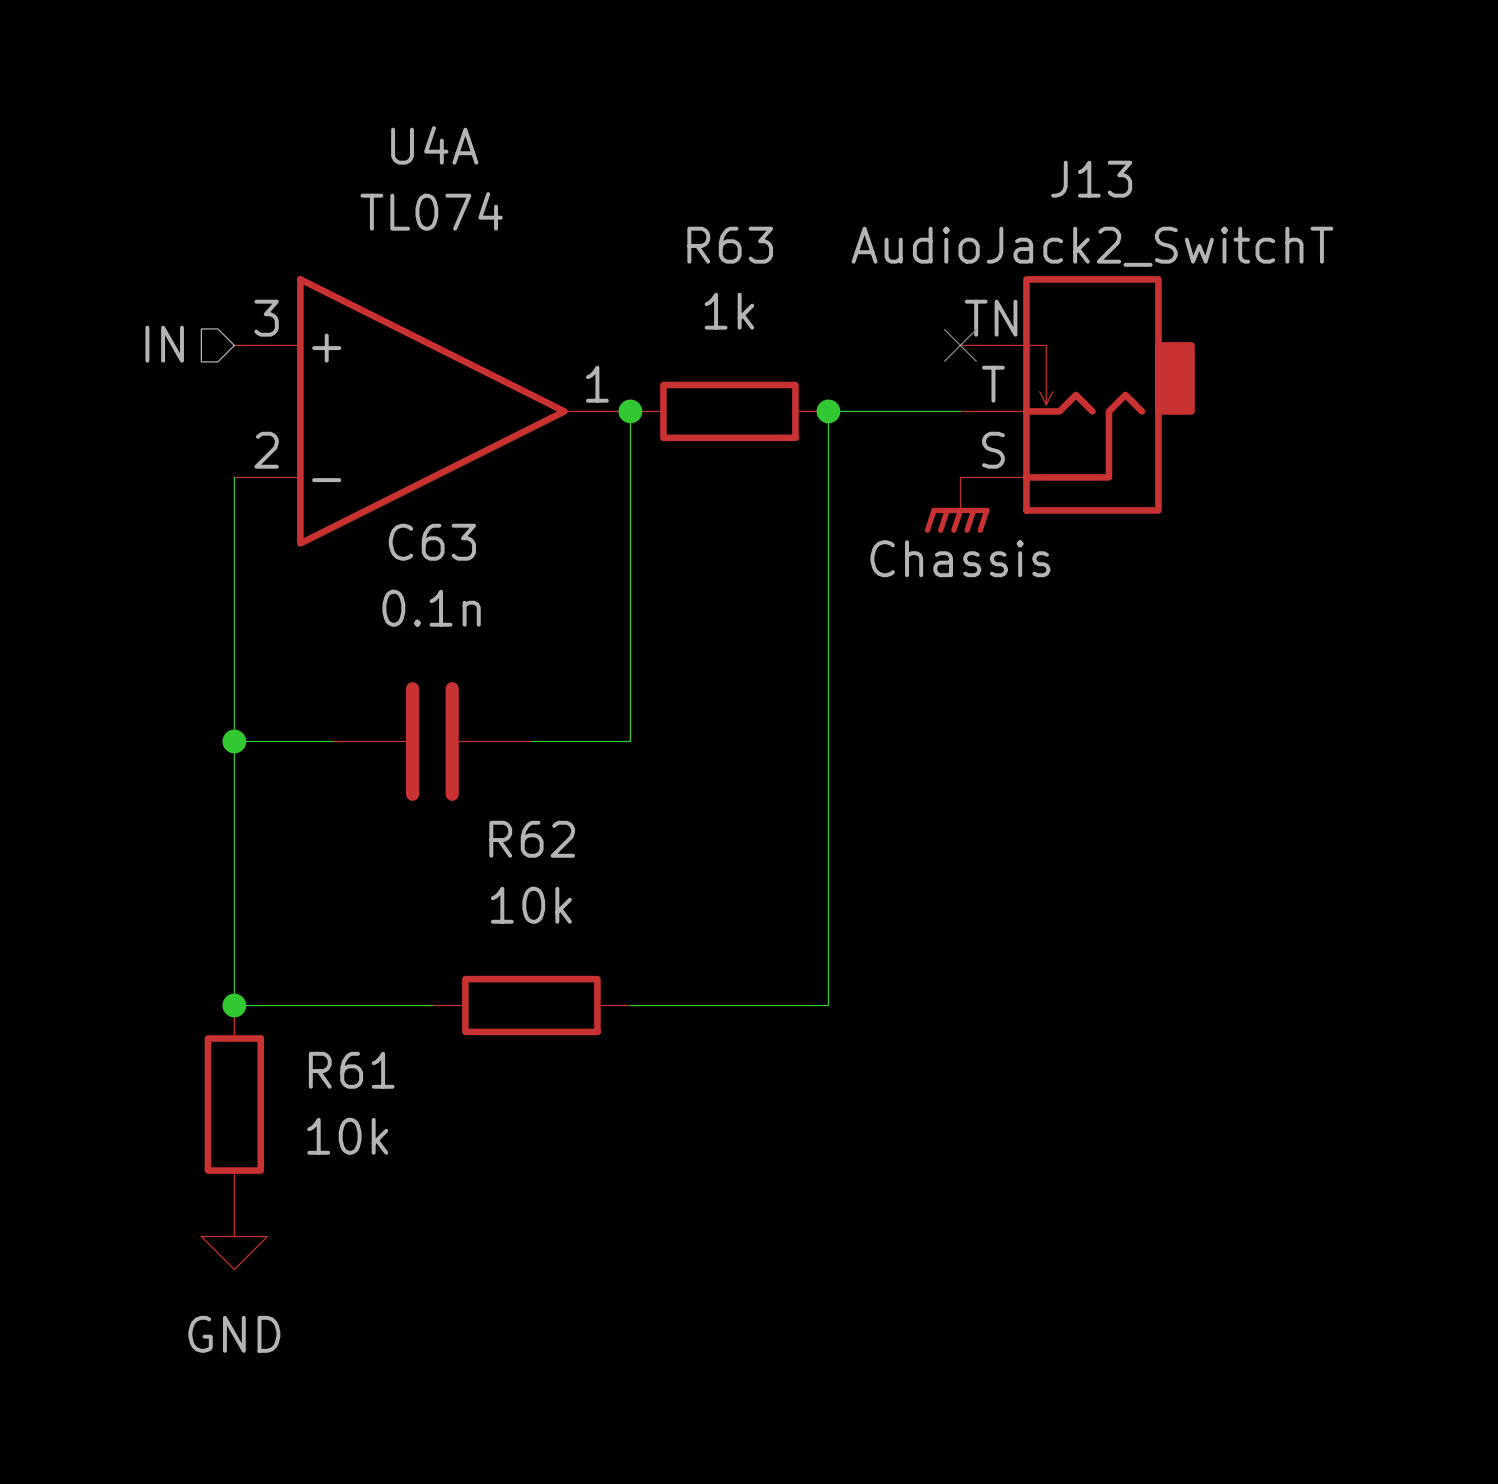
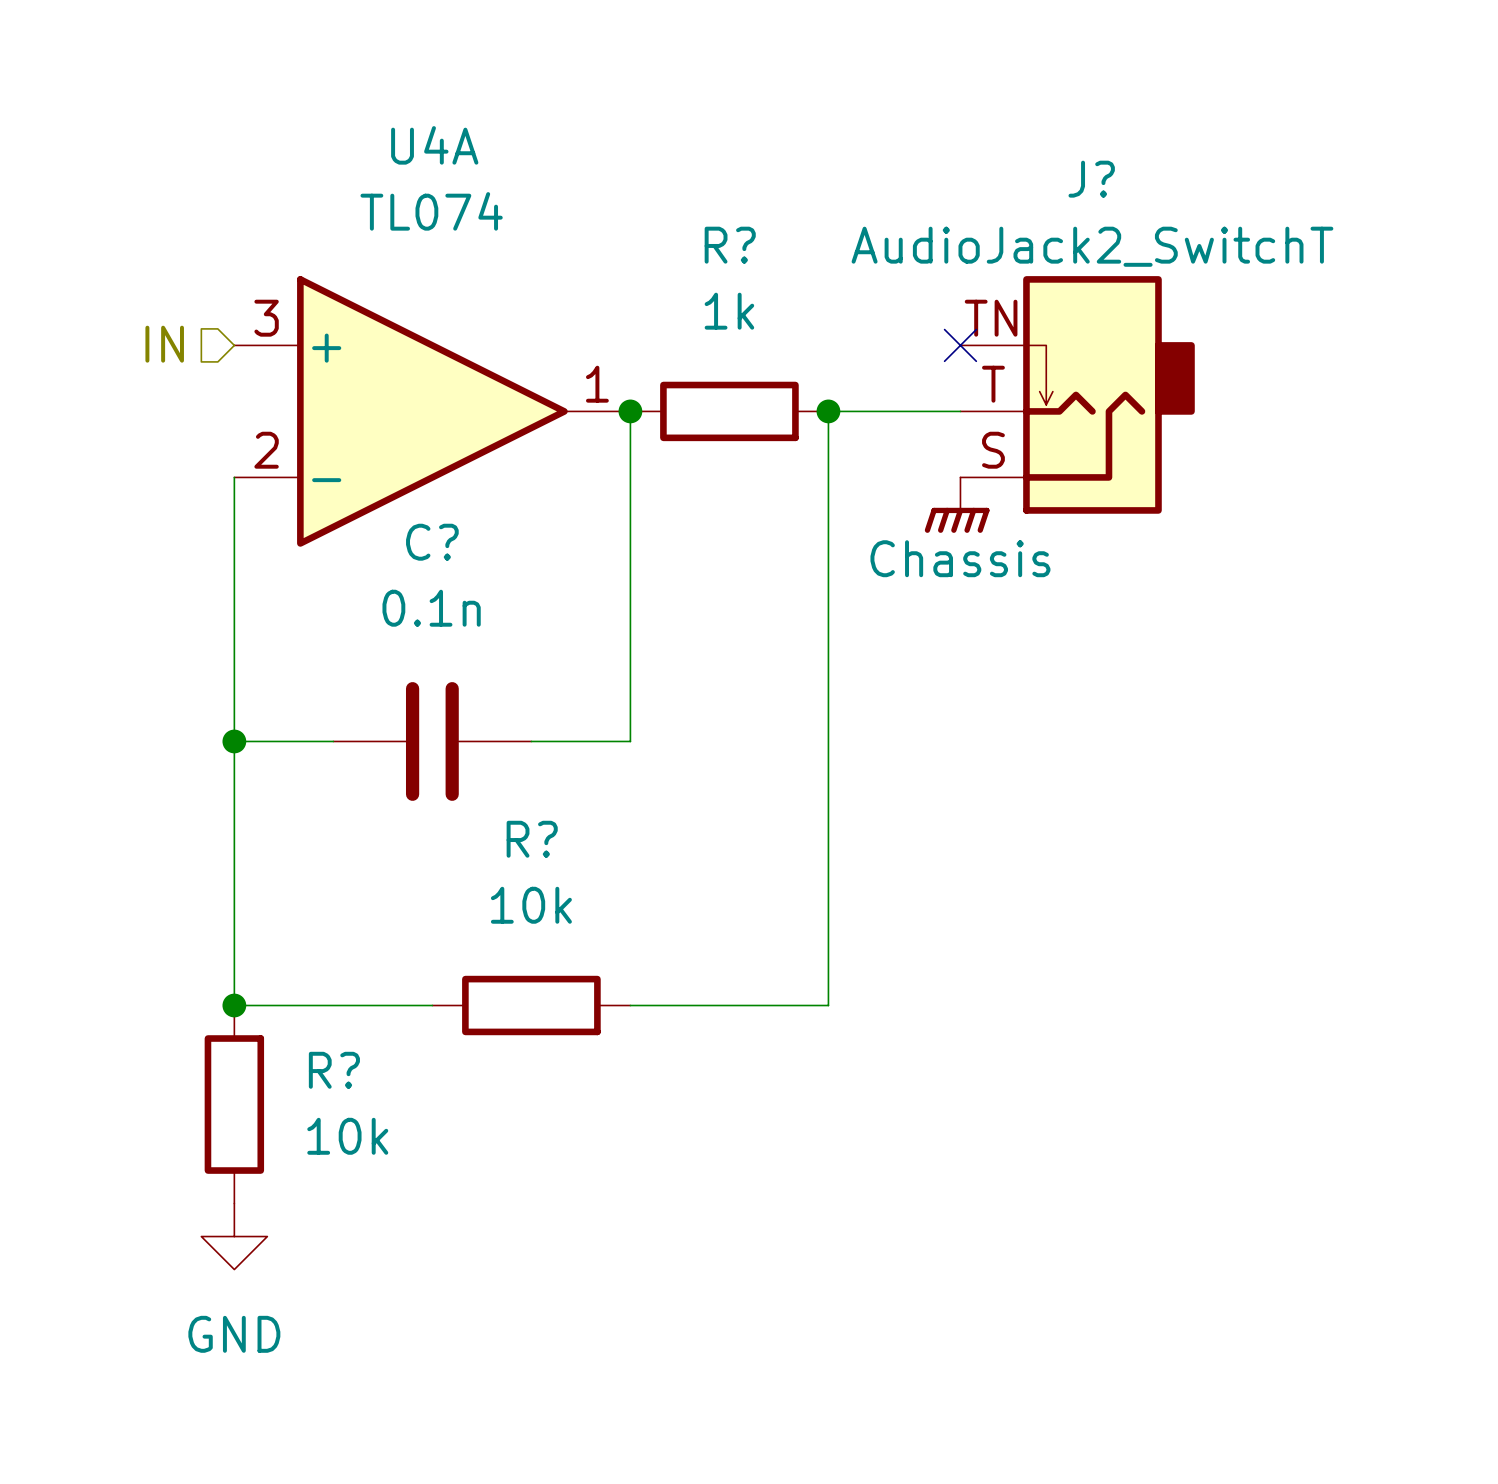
J13 name: J13 (1091, 179) -> J? (1091, 179)
R63 name: R63 (730, 245) -> R? (730, 245)
C63 name: C63 (432, 542) -> C? (432, 542)
R62 name: R62 (532, 839) -> R? (532, 839)
R61 name: R61 (351, 1070) -> R? (334, 1070)

